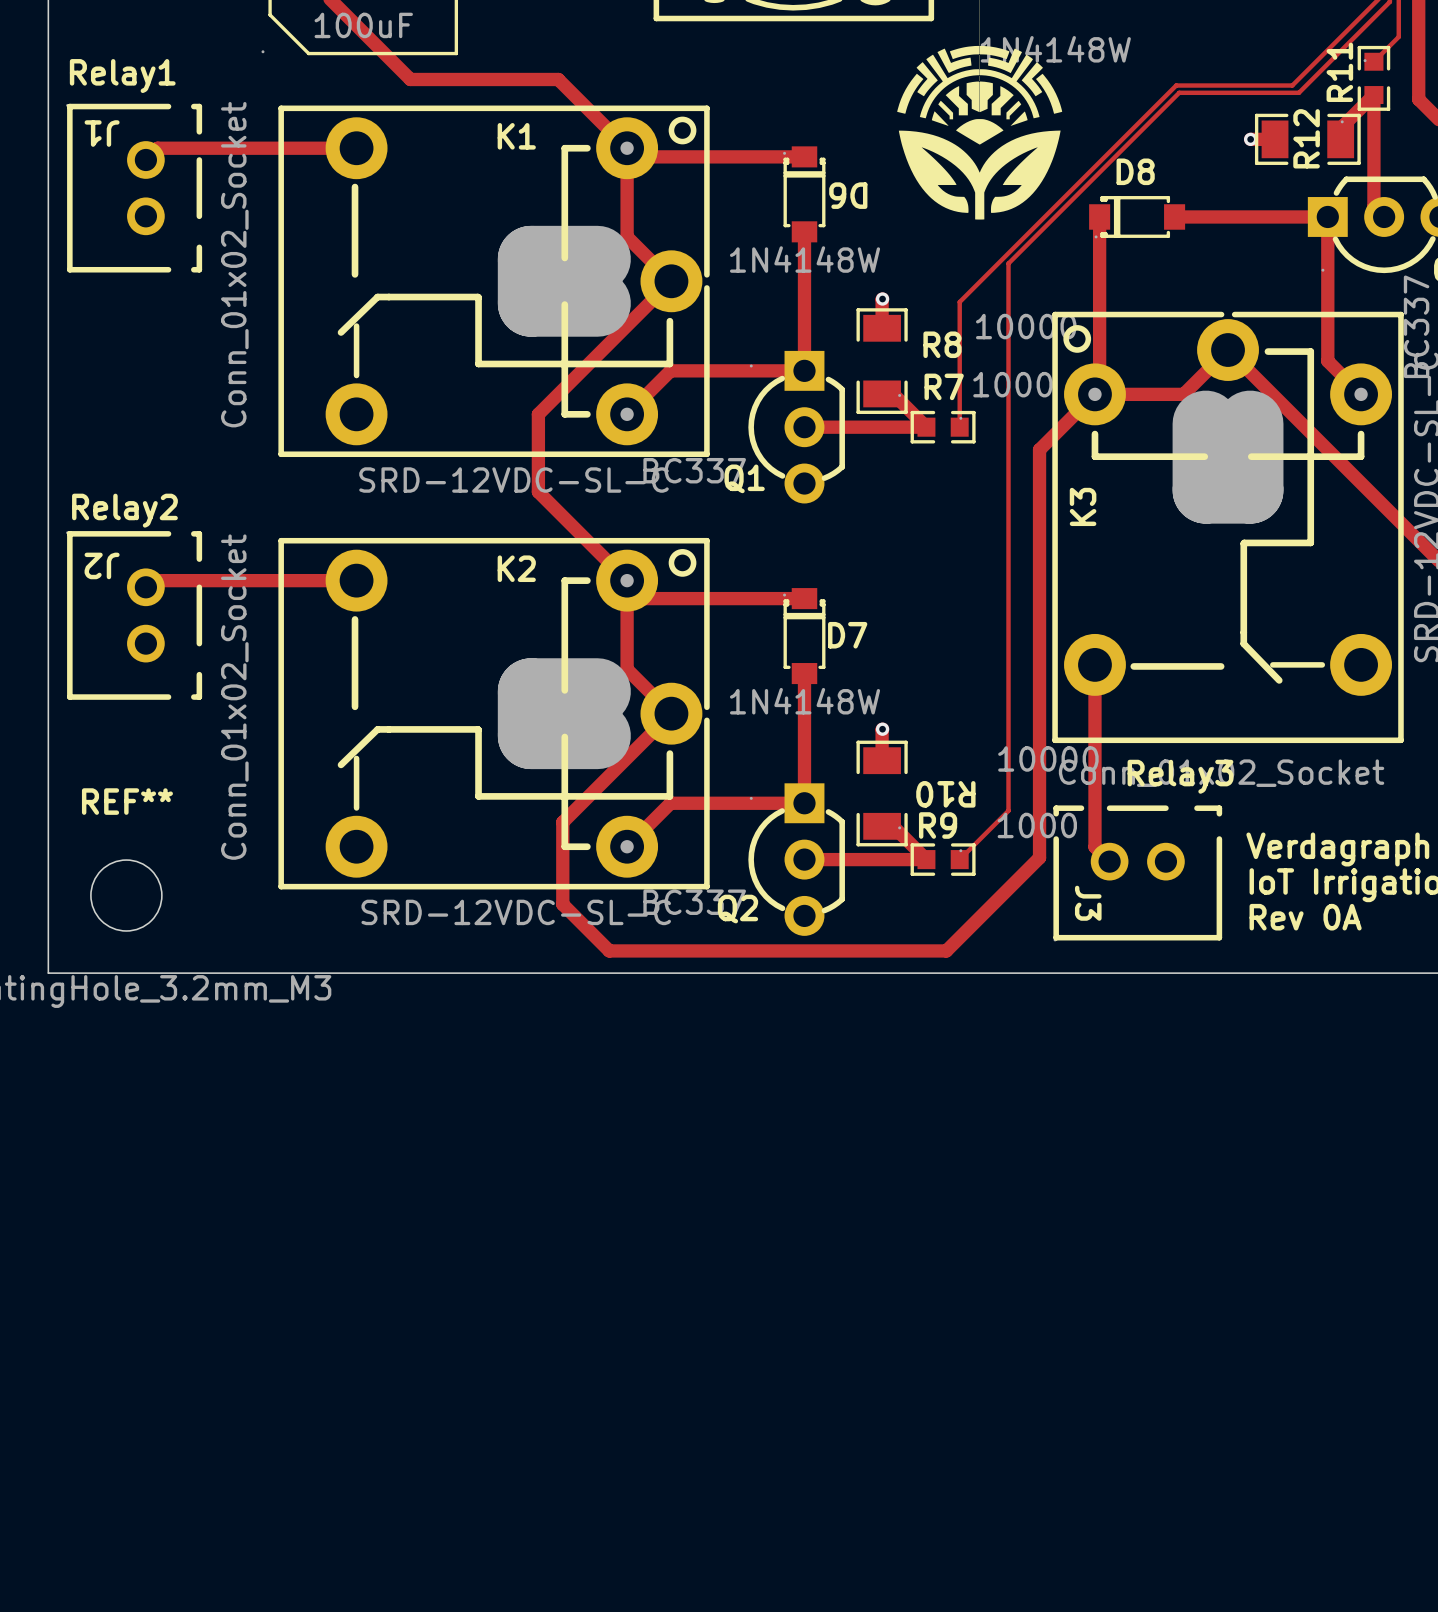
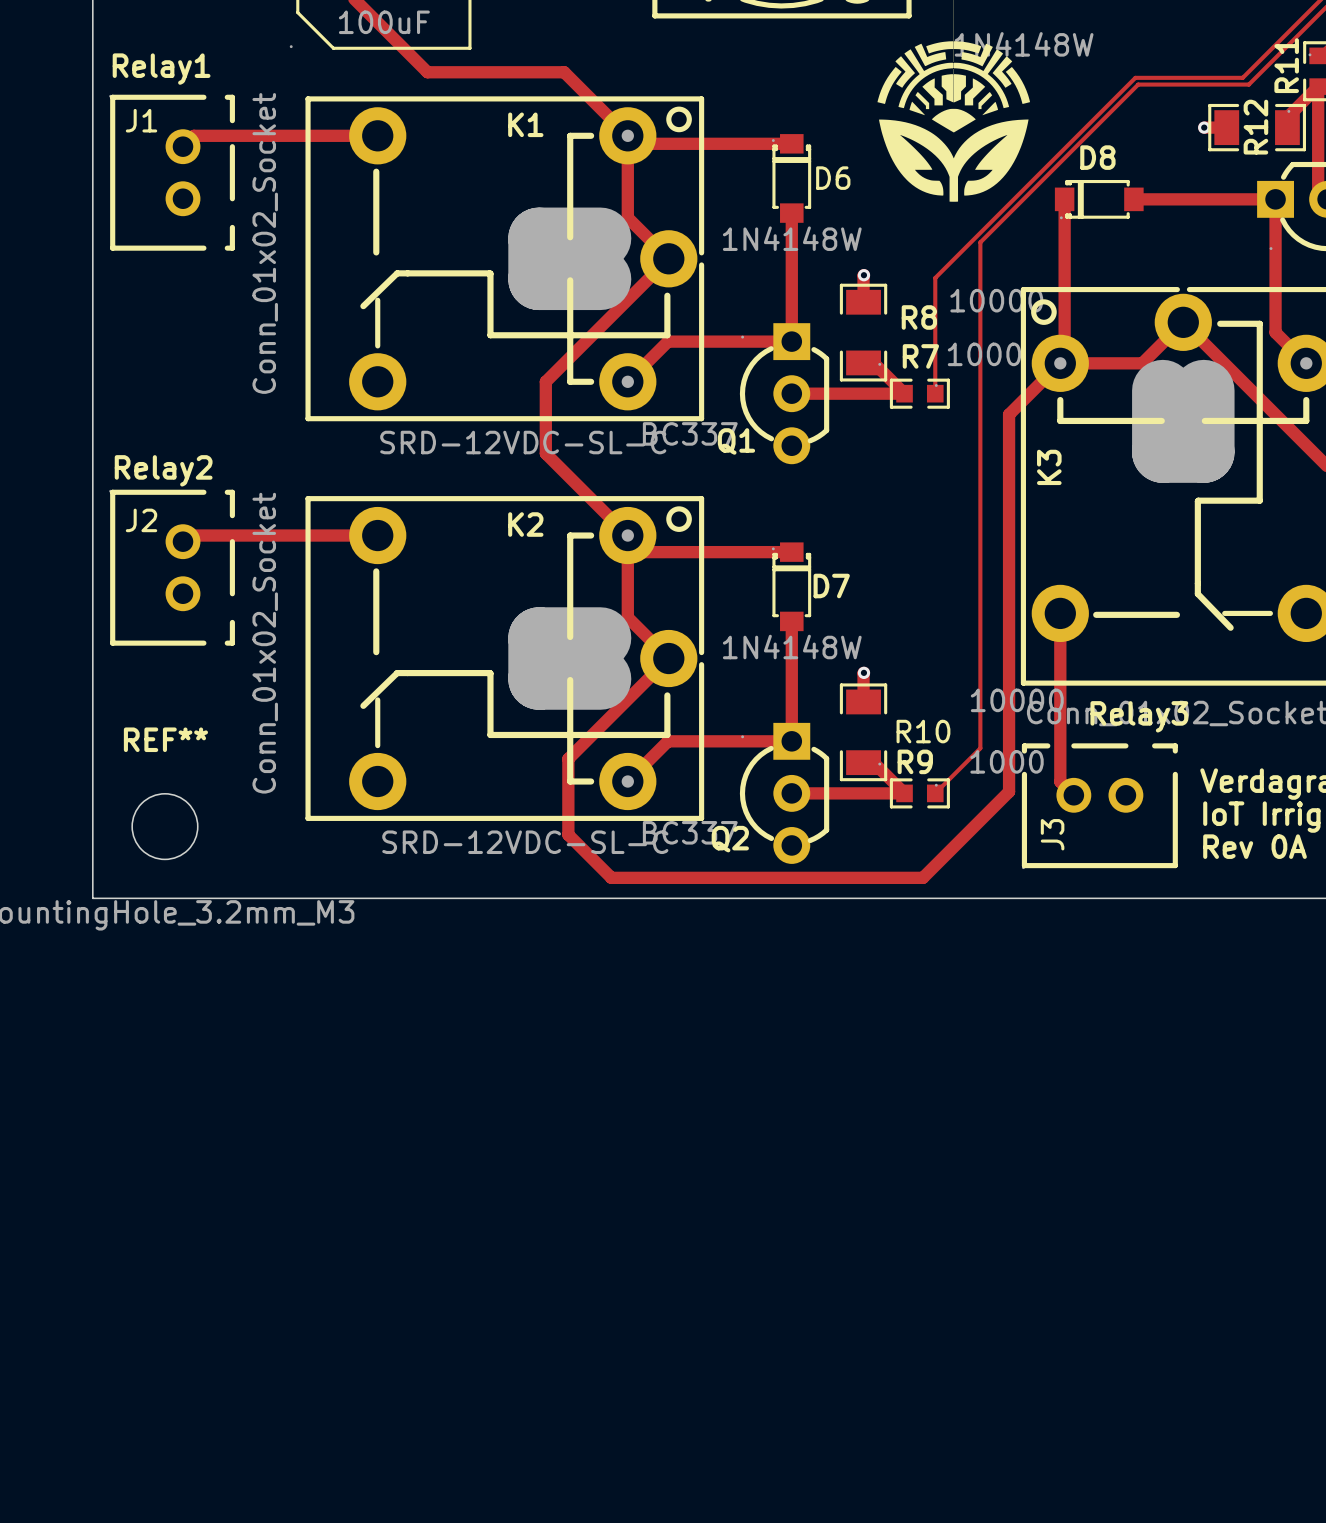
J1 name rotation: 0° (102, 133) -> 180° (141, 120)
D6 name rotation: 0° (848, 195) -> 180° (833, 178)
J2 name rotation: 0° (102, 565) -> 180° (141, 520)
R10 name rotation: 0° (945, 794) -> 180° (923, 731)
J3 name rotation: 0° (1088, 903) -> 180° (1052, 834)

